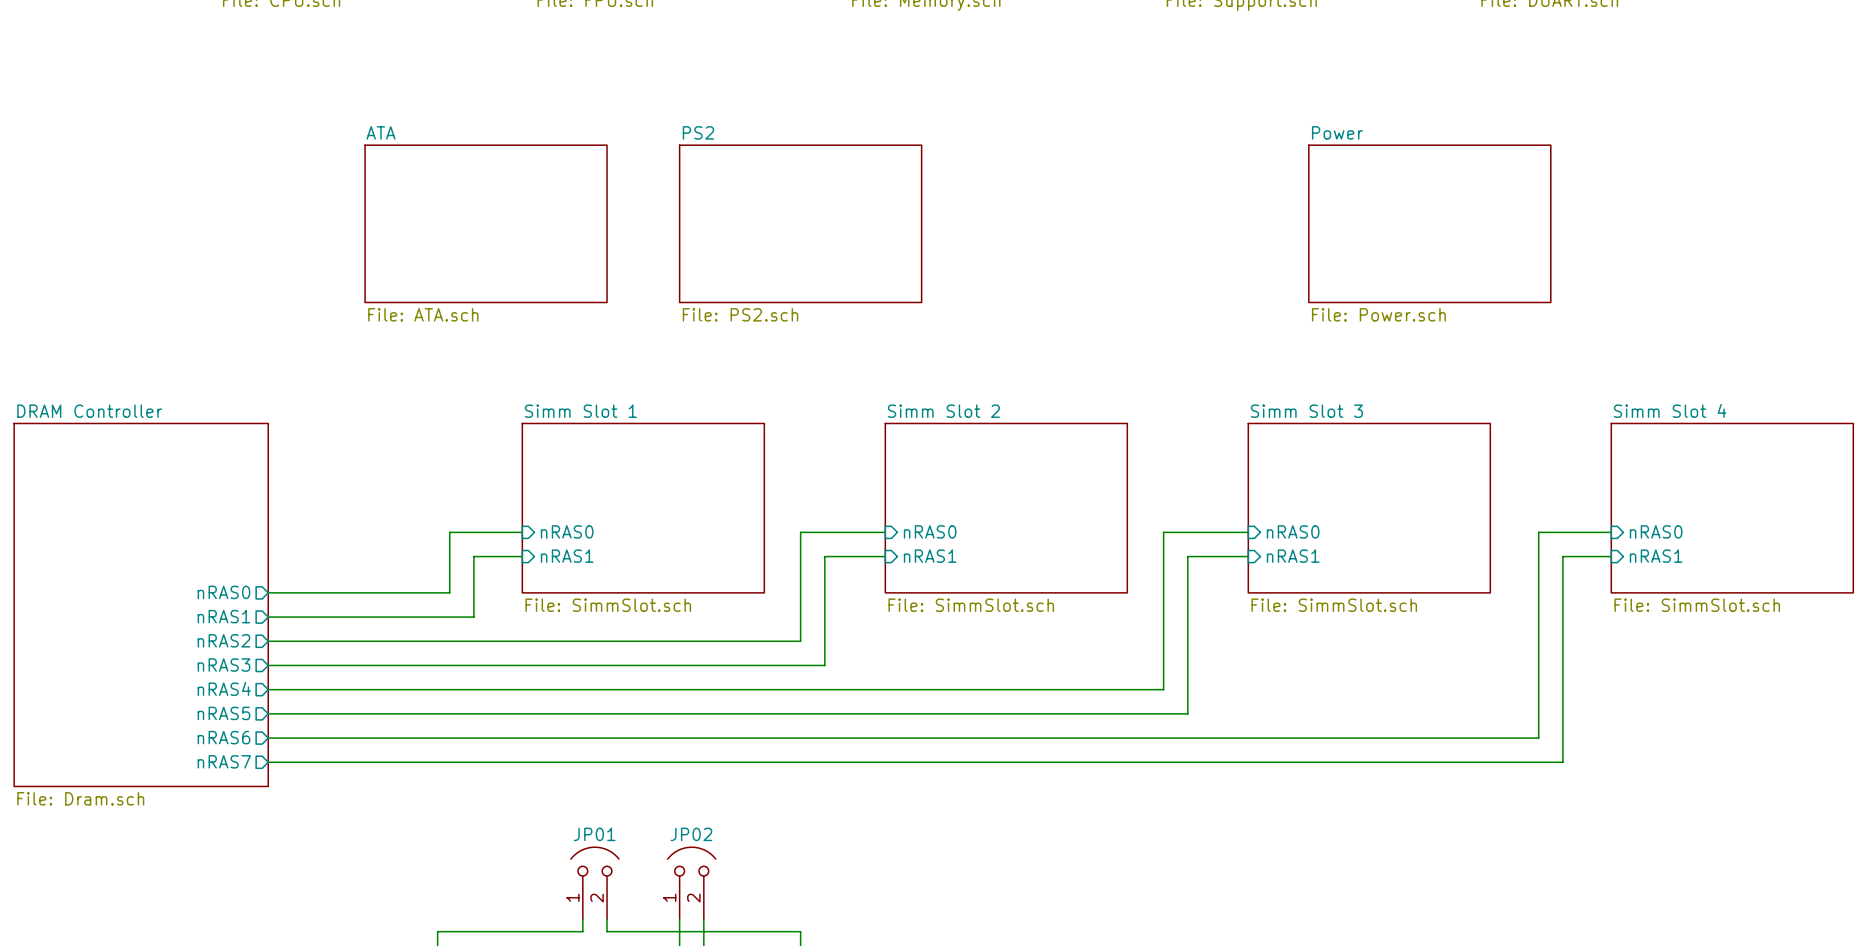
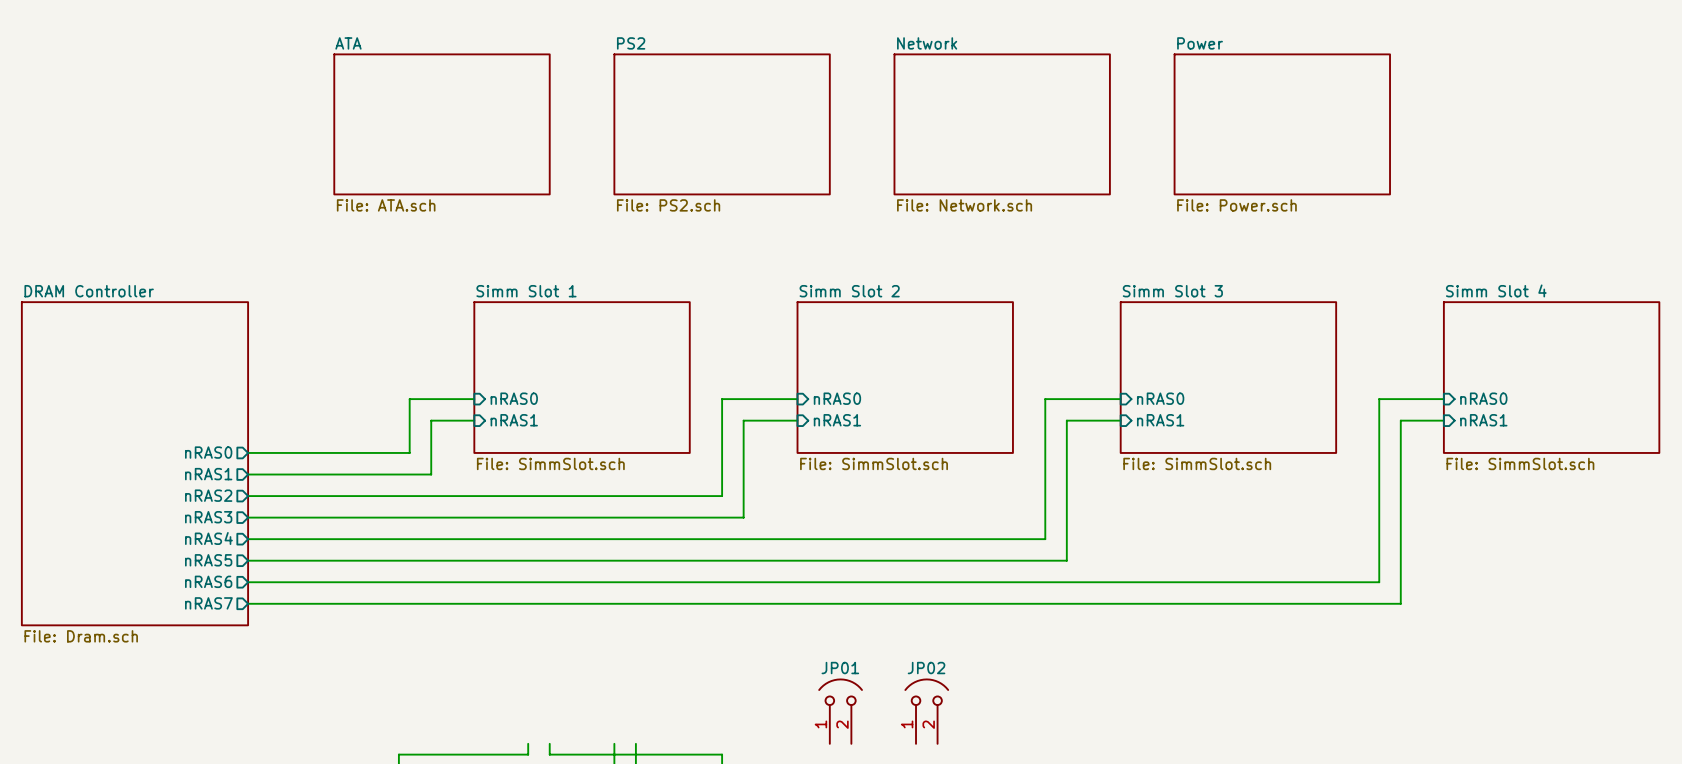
sheet Network: none -> File: Network.sch (1002, 124)
JP01 position: (594, 883) -> (840, 711)
JP02 position: (691, 883) -> (926, 711)

